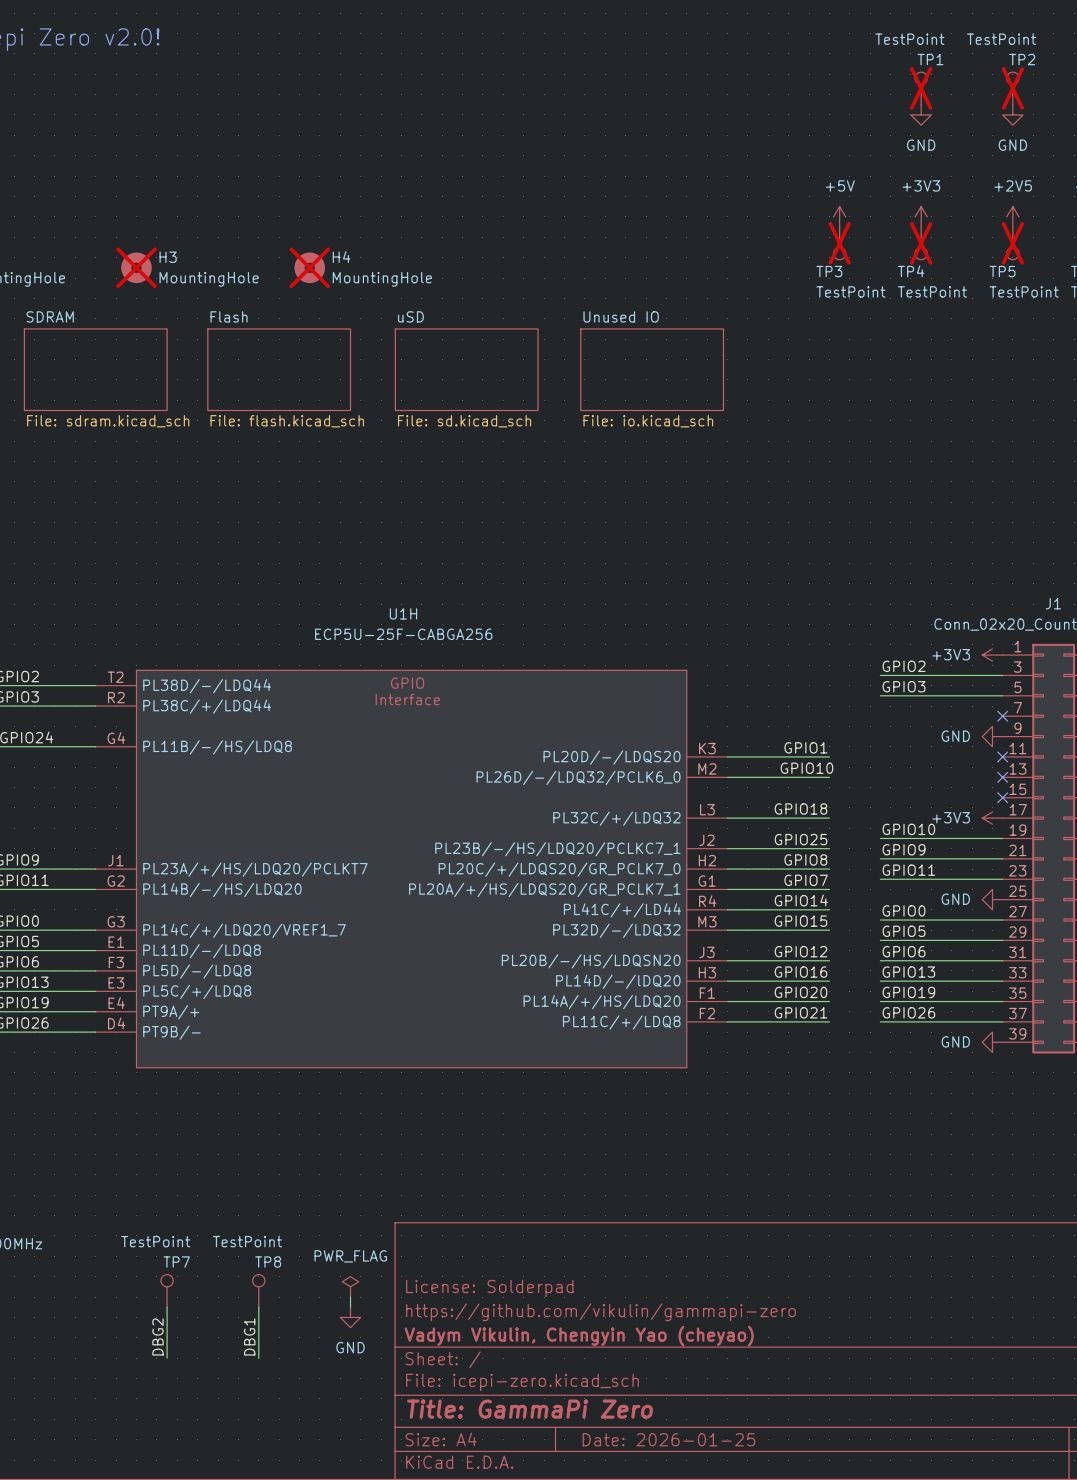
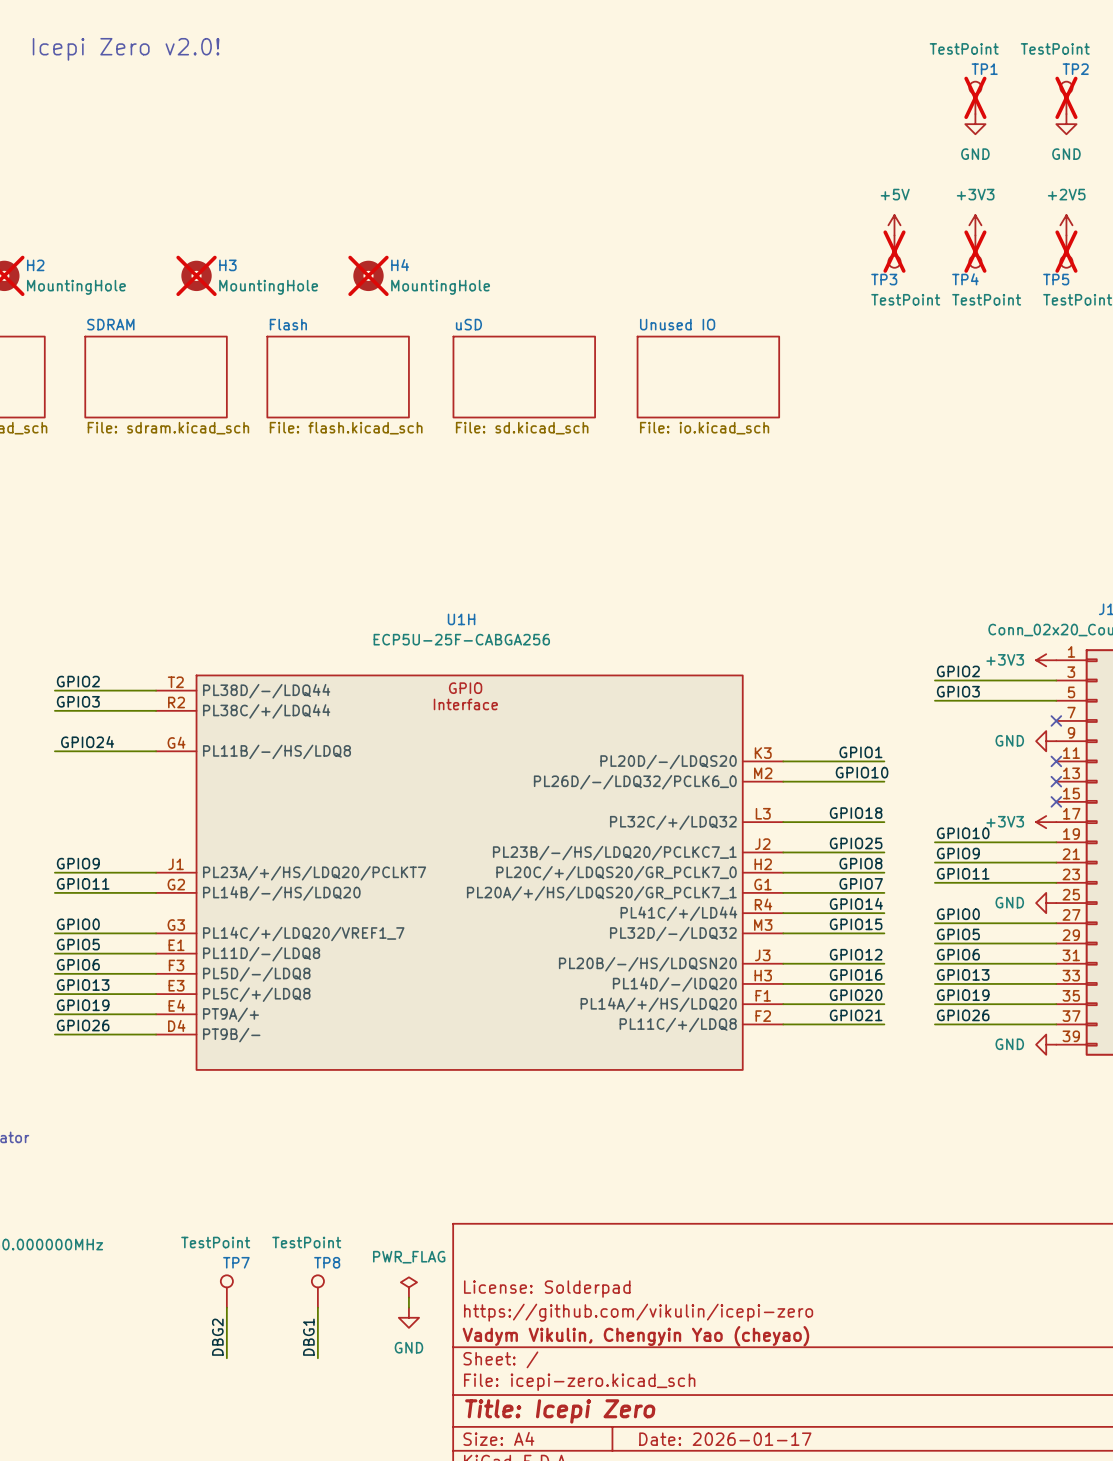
title block: https://github.com/vikulin/gammapi-zero (601, 1312) -> https://github.com/vikulin/icepi-zero (638, 1312)
title block: Title: GammaPi Zero (530, 1409) -> Title: Icepi Zero (560, 1411)
title block: Date: 2026-01-25 (668, 1439) -> Date: 2026-01-17 (725, 1439)

